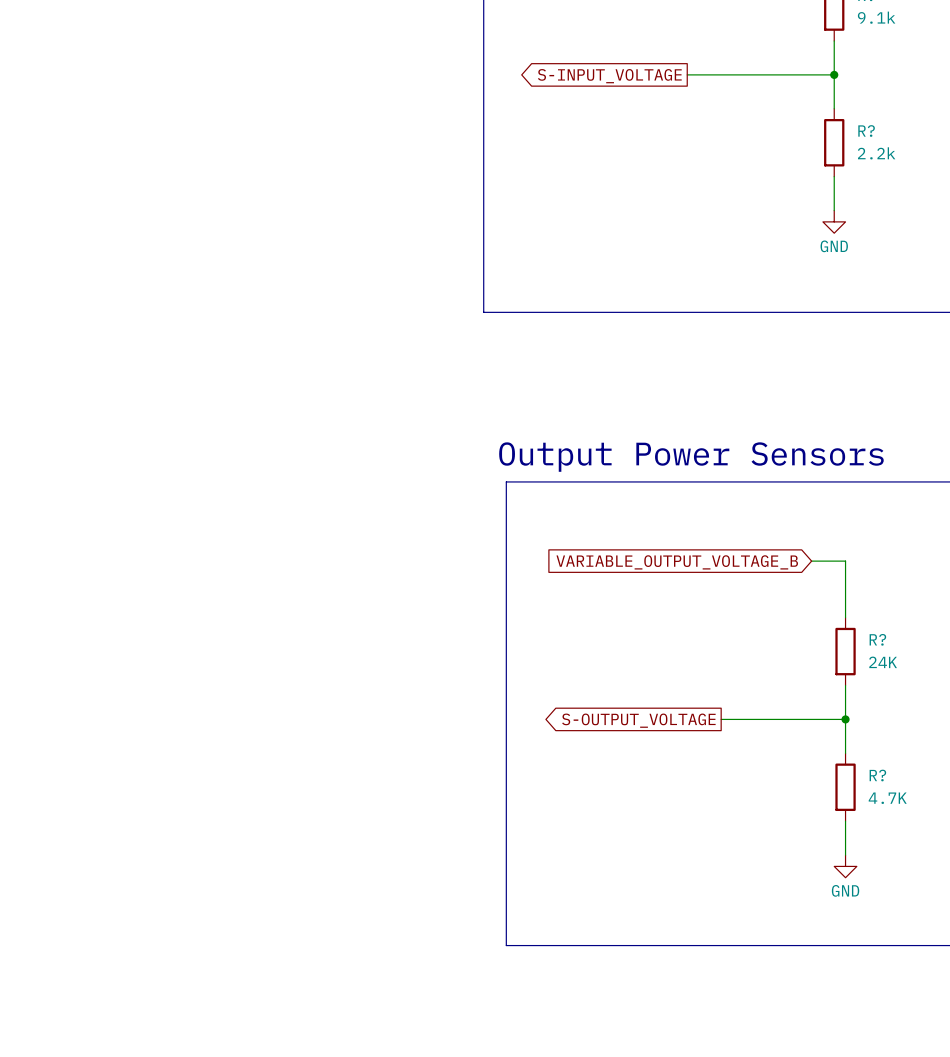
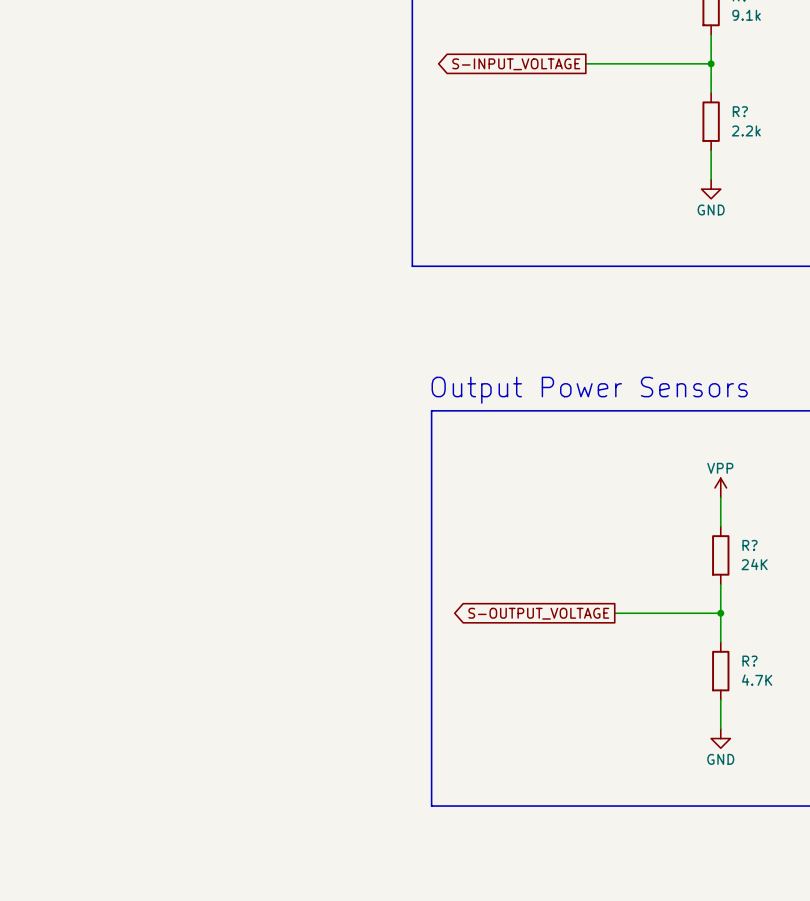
wire: (811, 561) (845, 561) (845, 583) -> none
global label: VARIABLE_OUTPUT_VOLTAGE_B (677, 562) -> none
power symbol: none -> VPP (720, 487)

